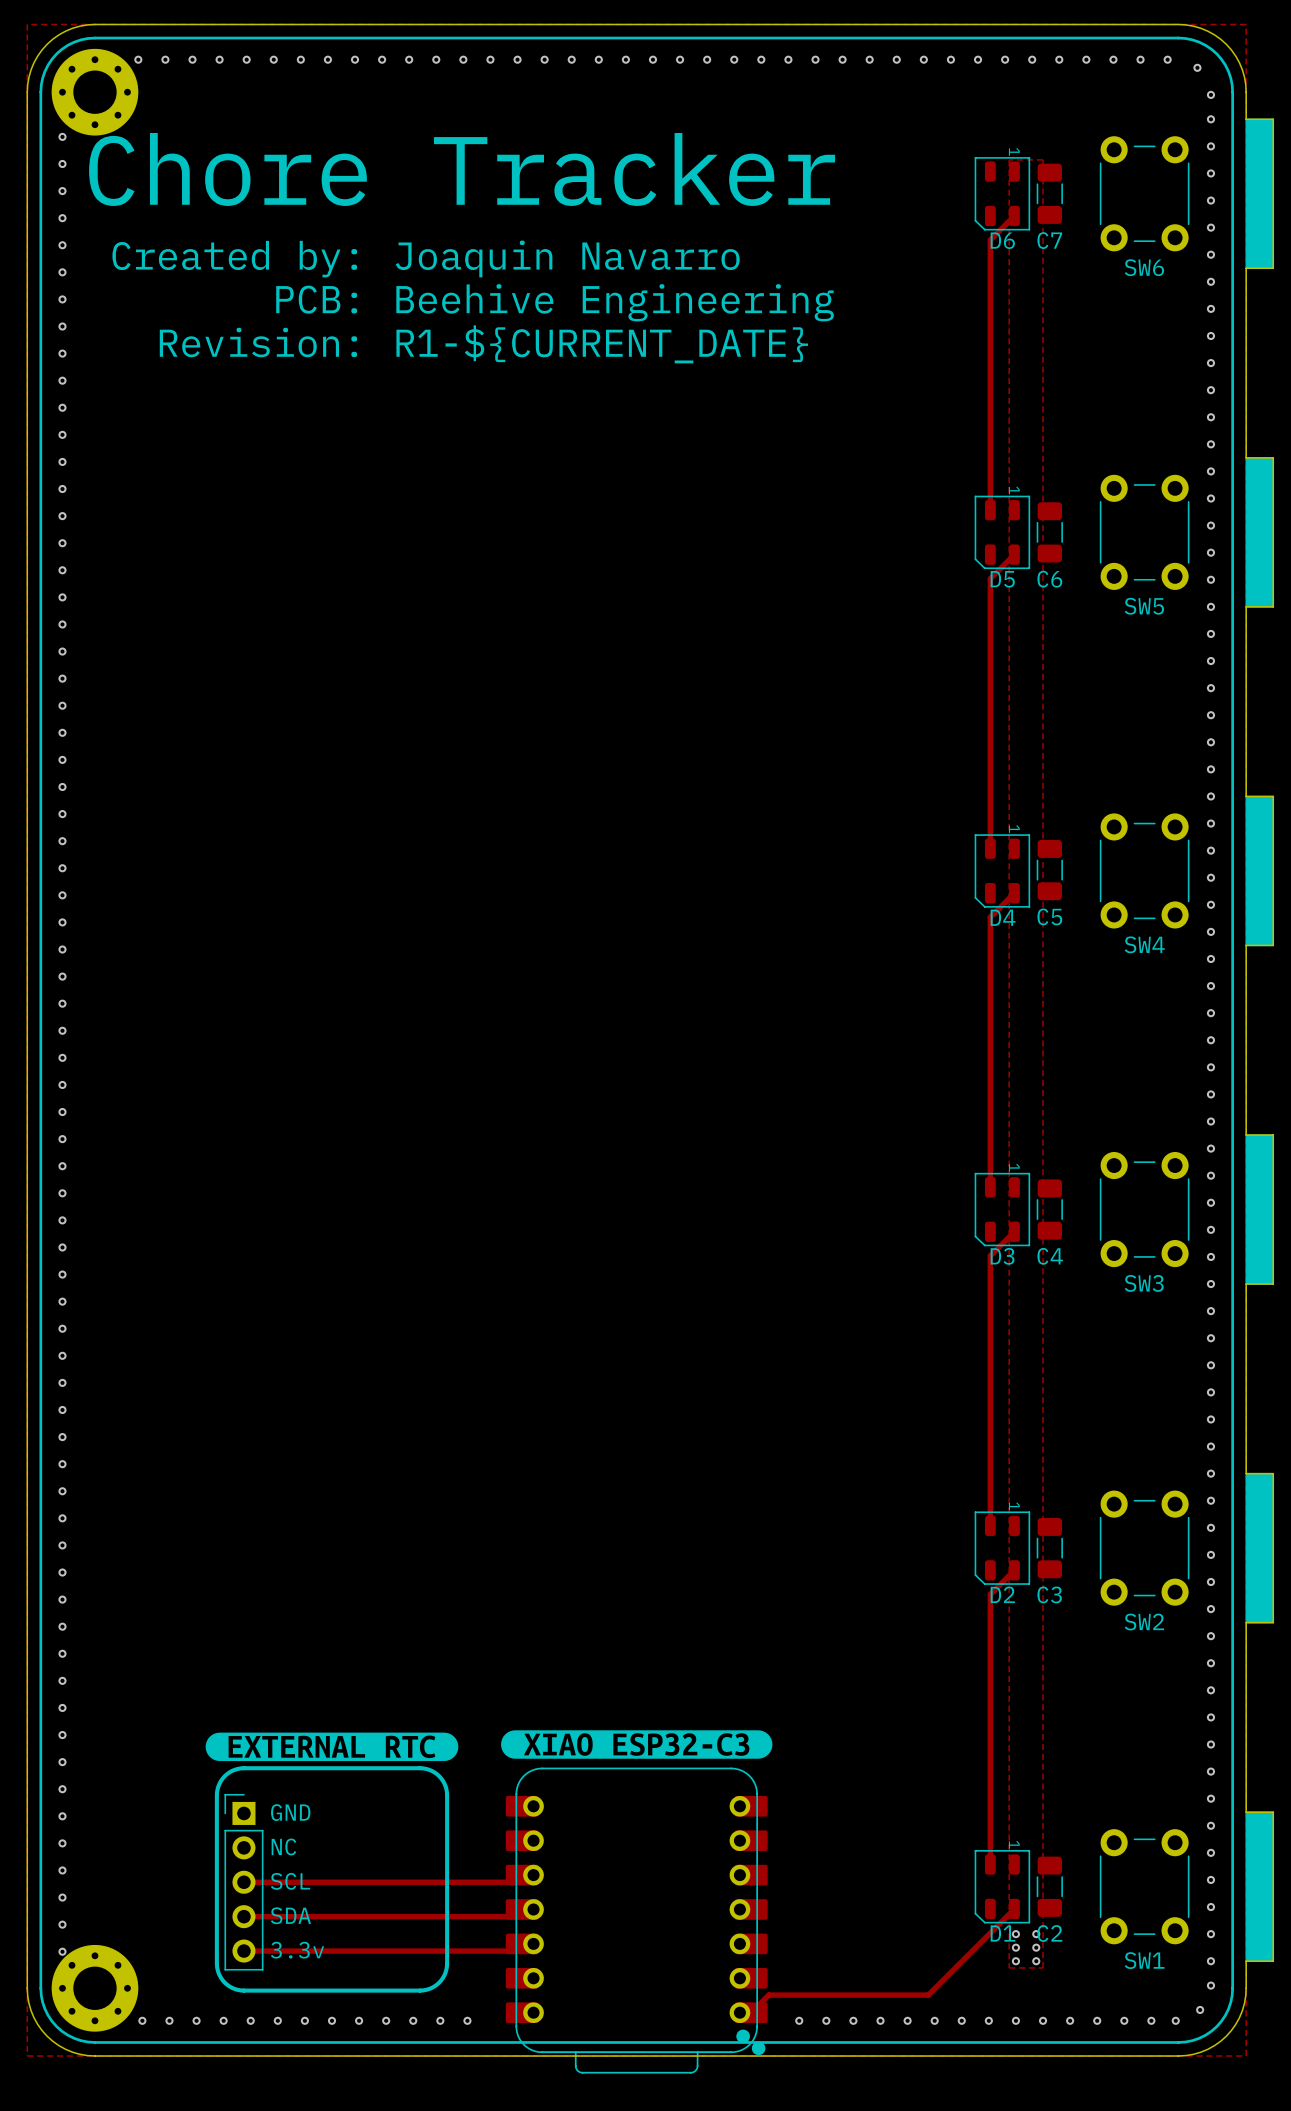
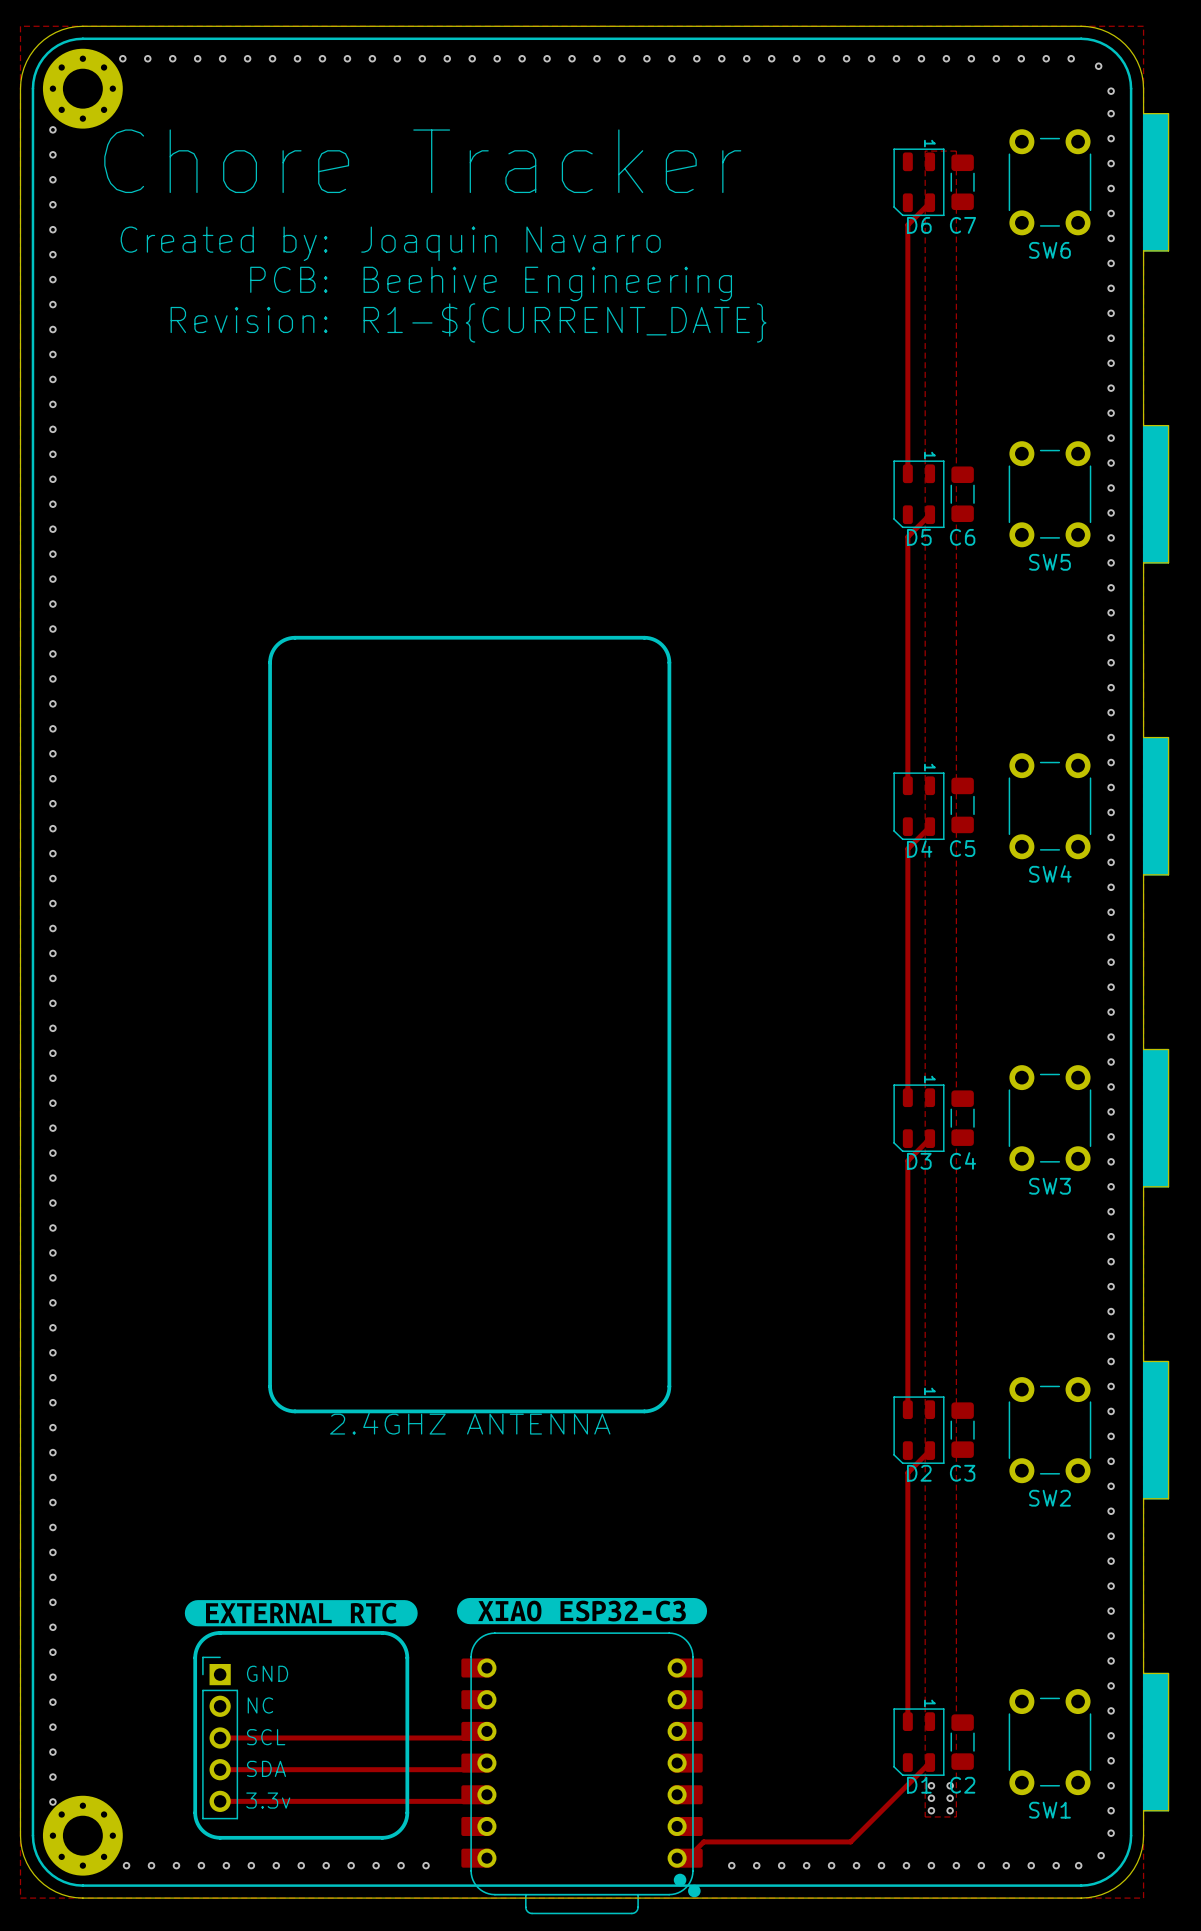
line: none -> (295, 637) (644, 637) (657, 641) (666, 651) (669, 662) (669, 1386) (665, 1399) (655, 1408) (644, 1411) (295, 1411) (281, 1407) (272, 1397) (270, 1386) (270, 662) (272, 651) (277, 645) (286, 639) (295, 637)
text: none -> 2.4GHZ ANTENNA (470, 1423)

